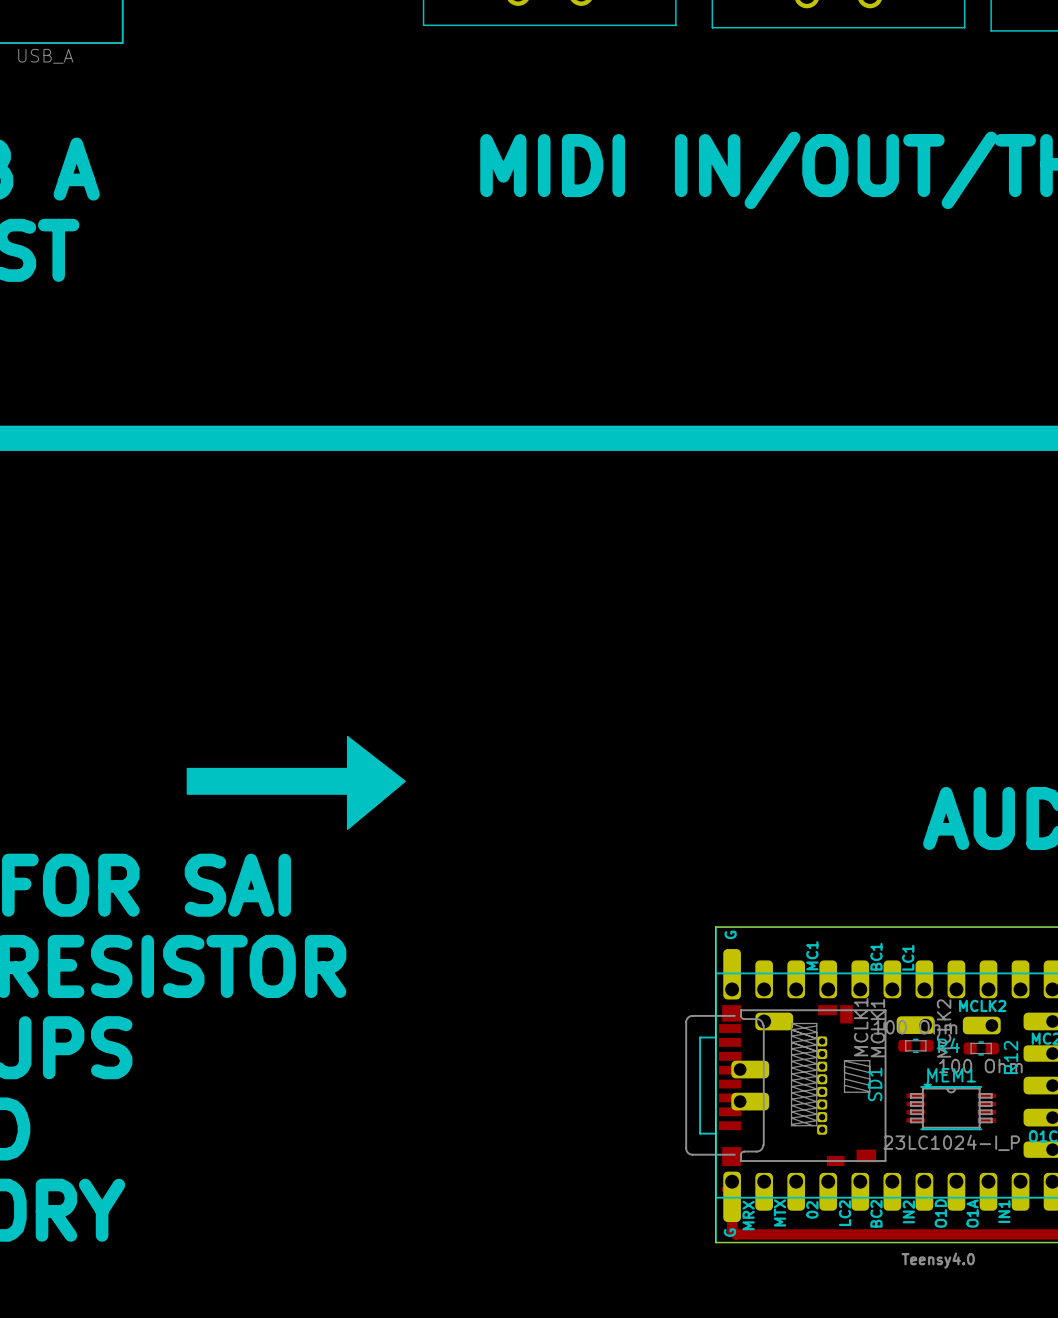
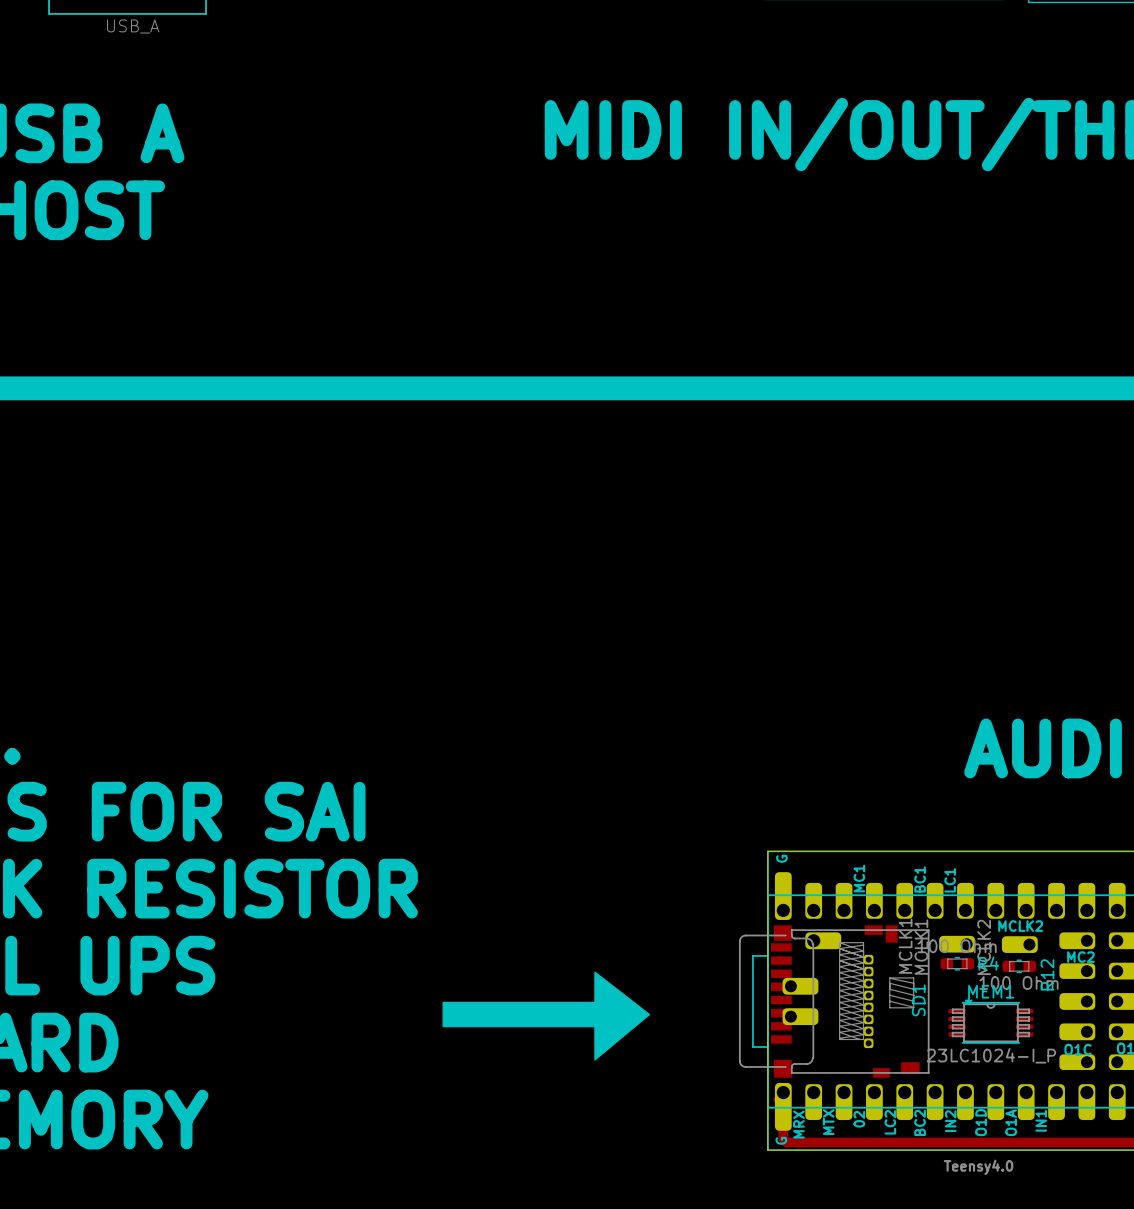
drawing: [186, 735, 406, 831] -> none
drawing: none -> [442, 971, 651, 1061]

